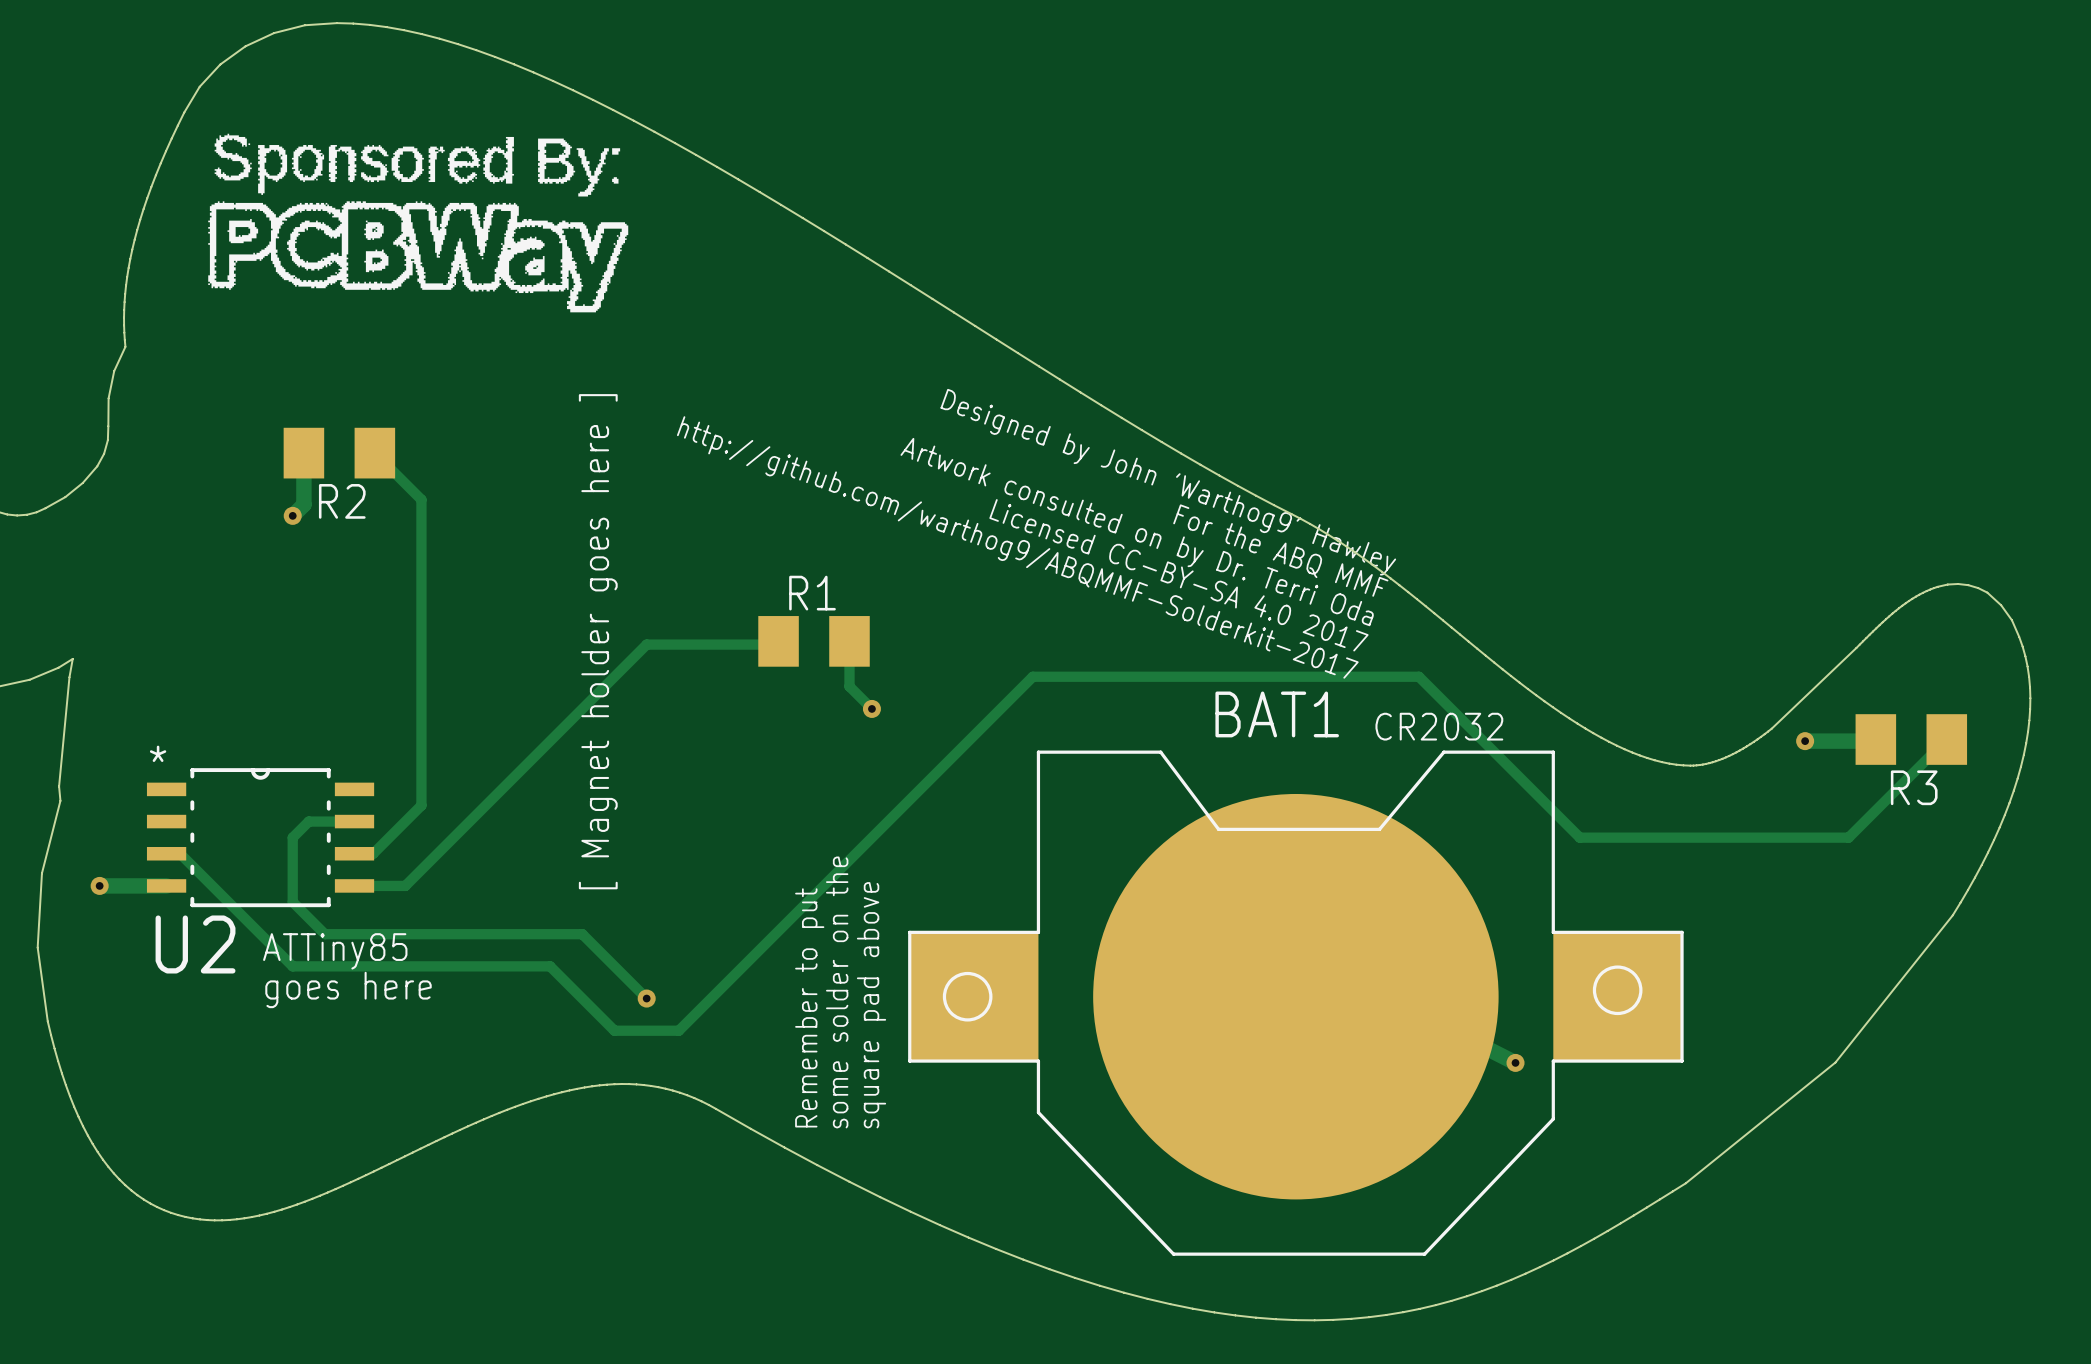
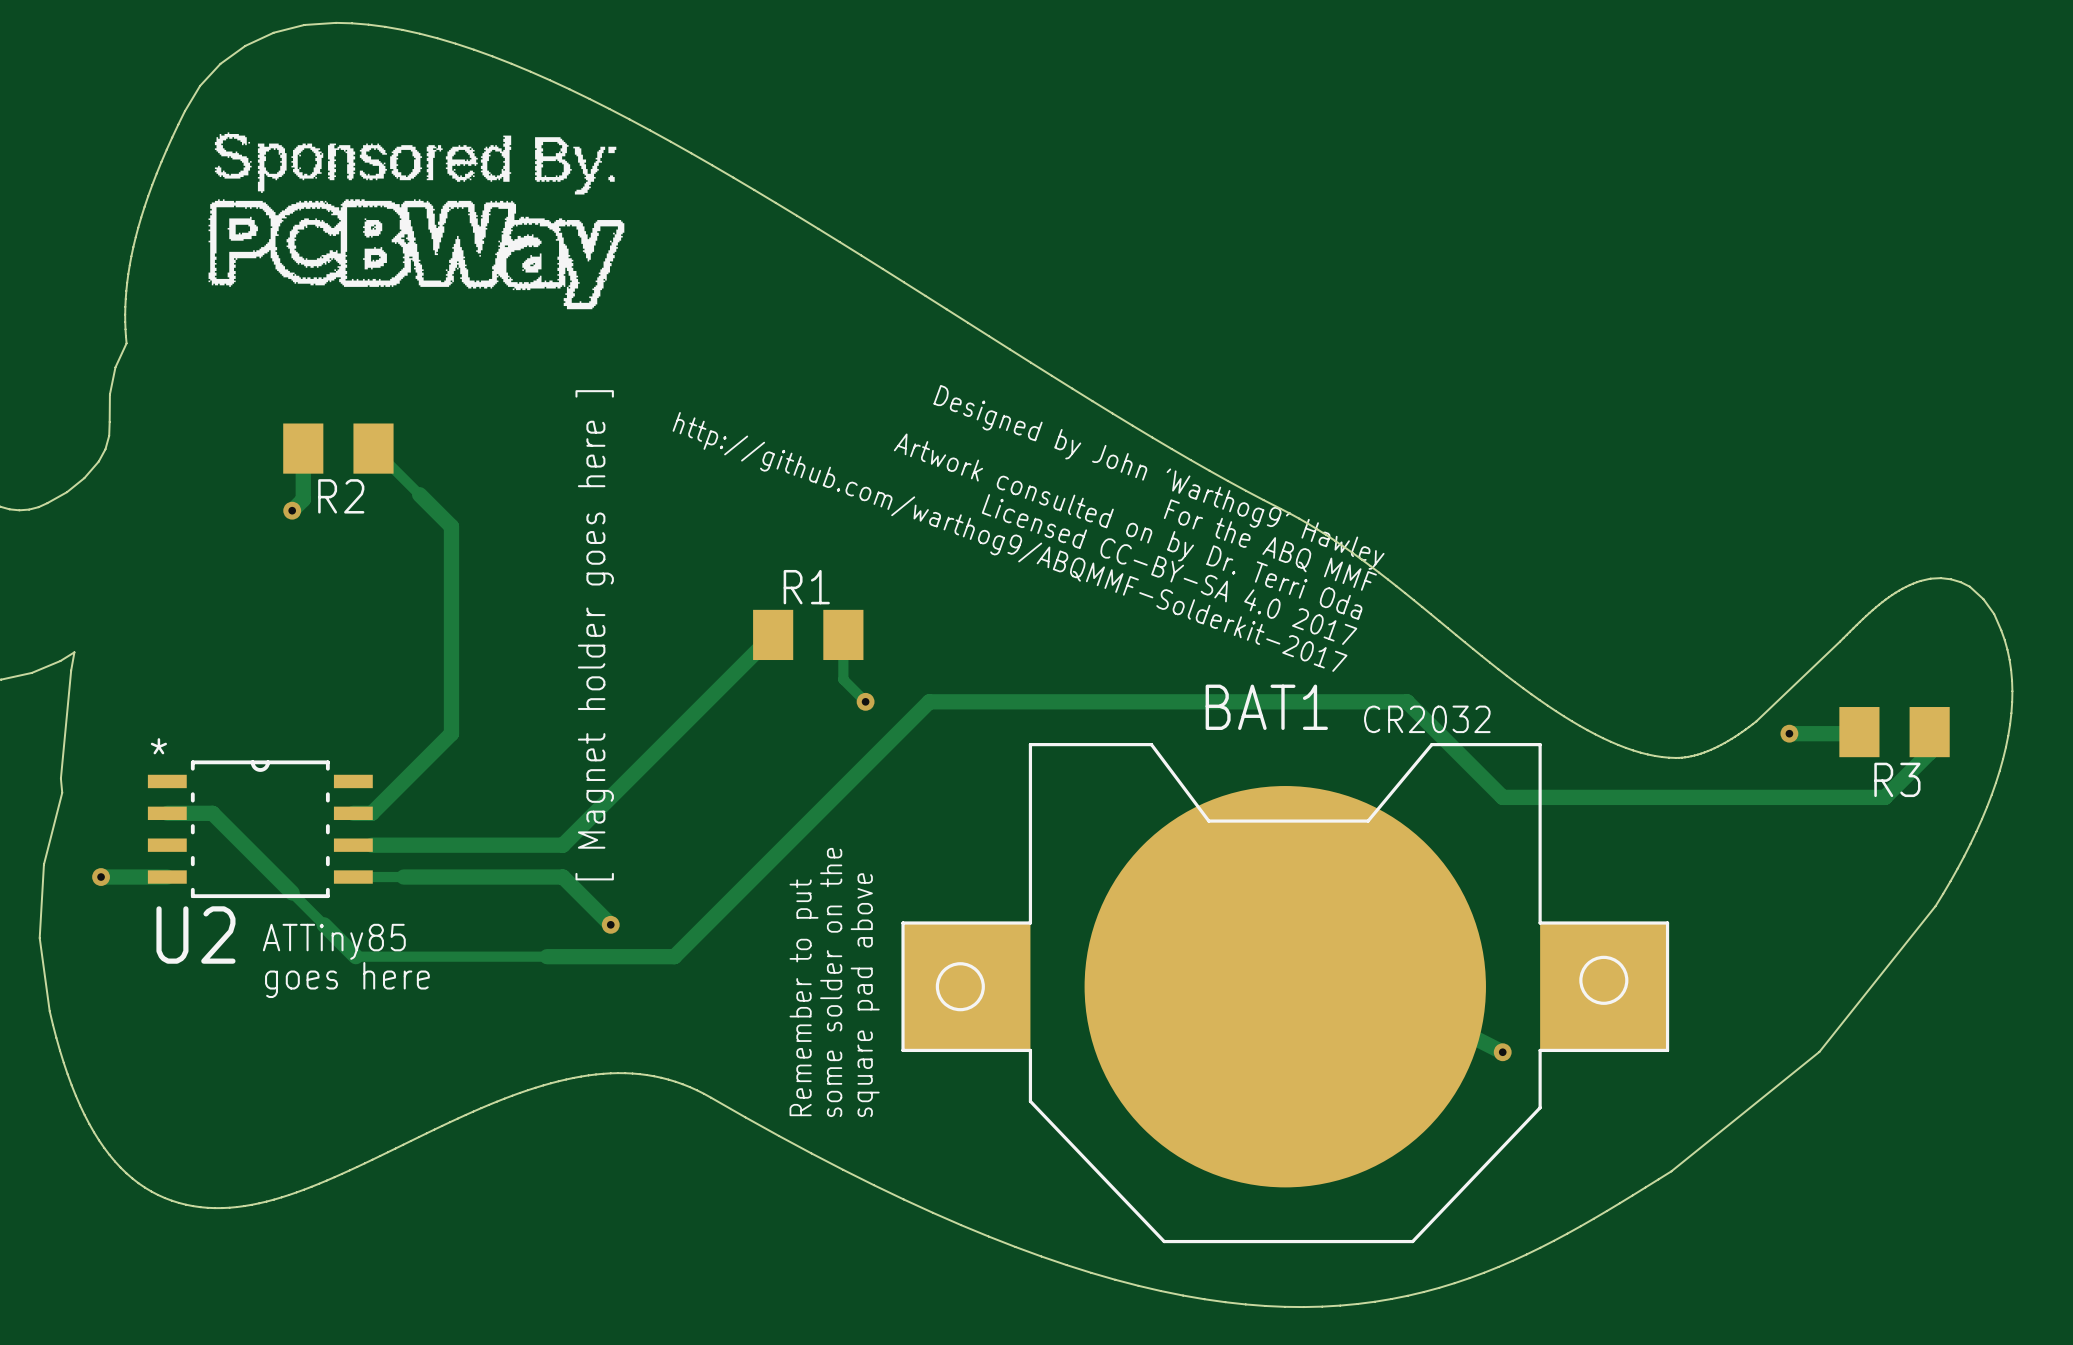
track: (421, 499) (421, 805) (373, 853) -> (419, 494) (451, 526) (451, 733) (371, 813) (353, 813)
track: (775, 644) (646, 644) (405, 885) -> (769, 638) (562, 845) (371, 845)
track: (1946, 739) (1848, 837) (1579, 837) (1418, 676) (1032, 676) (678, 1030) (614, 1030) (550, 966) -> (1929, 732) (1929, 752) (1884, 797) (1502, 797) (1407, 701) (929, 701) (674, 956) (547, 956)
track: (354, 821) (308, 821) (292, 837) (292, 902) -> (167, 813) (212, 813) (292, 892)
track: (166, 853) (180, 853) (292, 966) (357, 966) -> (324, 924) (355, 956)
track: none -> (403, 877) (562, 877) (610, 924)
track: (324, 934) (582, 934) (646, 998) -> none
via position: (646, 998) -> (610, 924)

